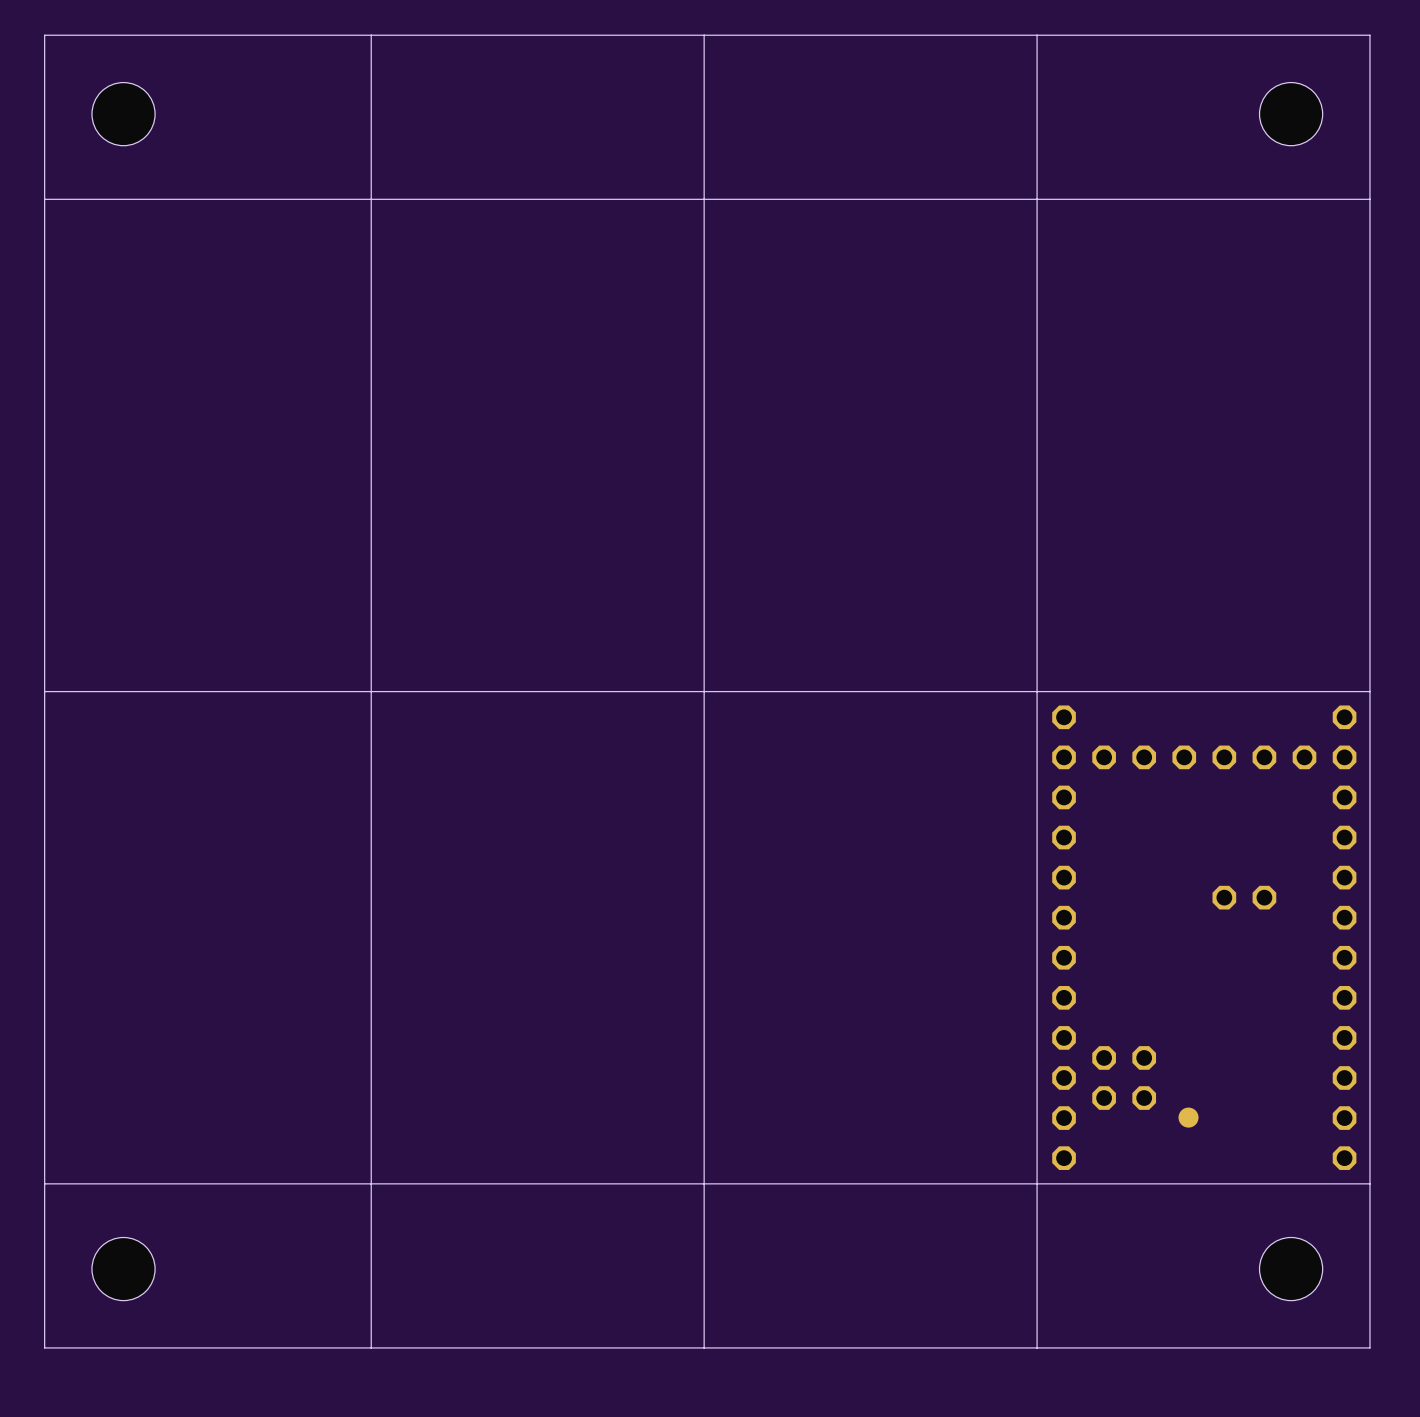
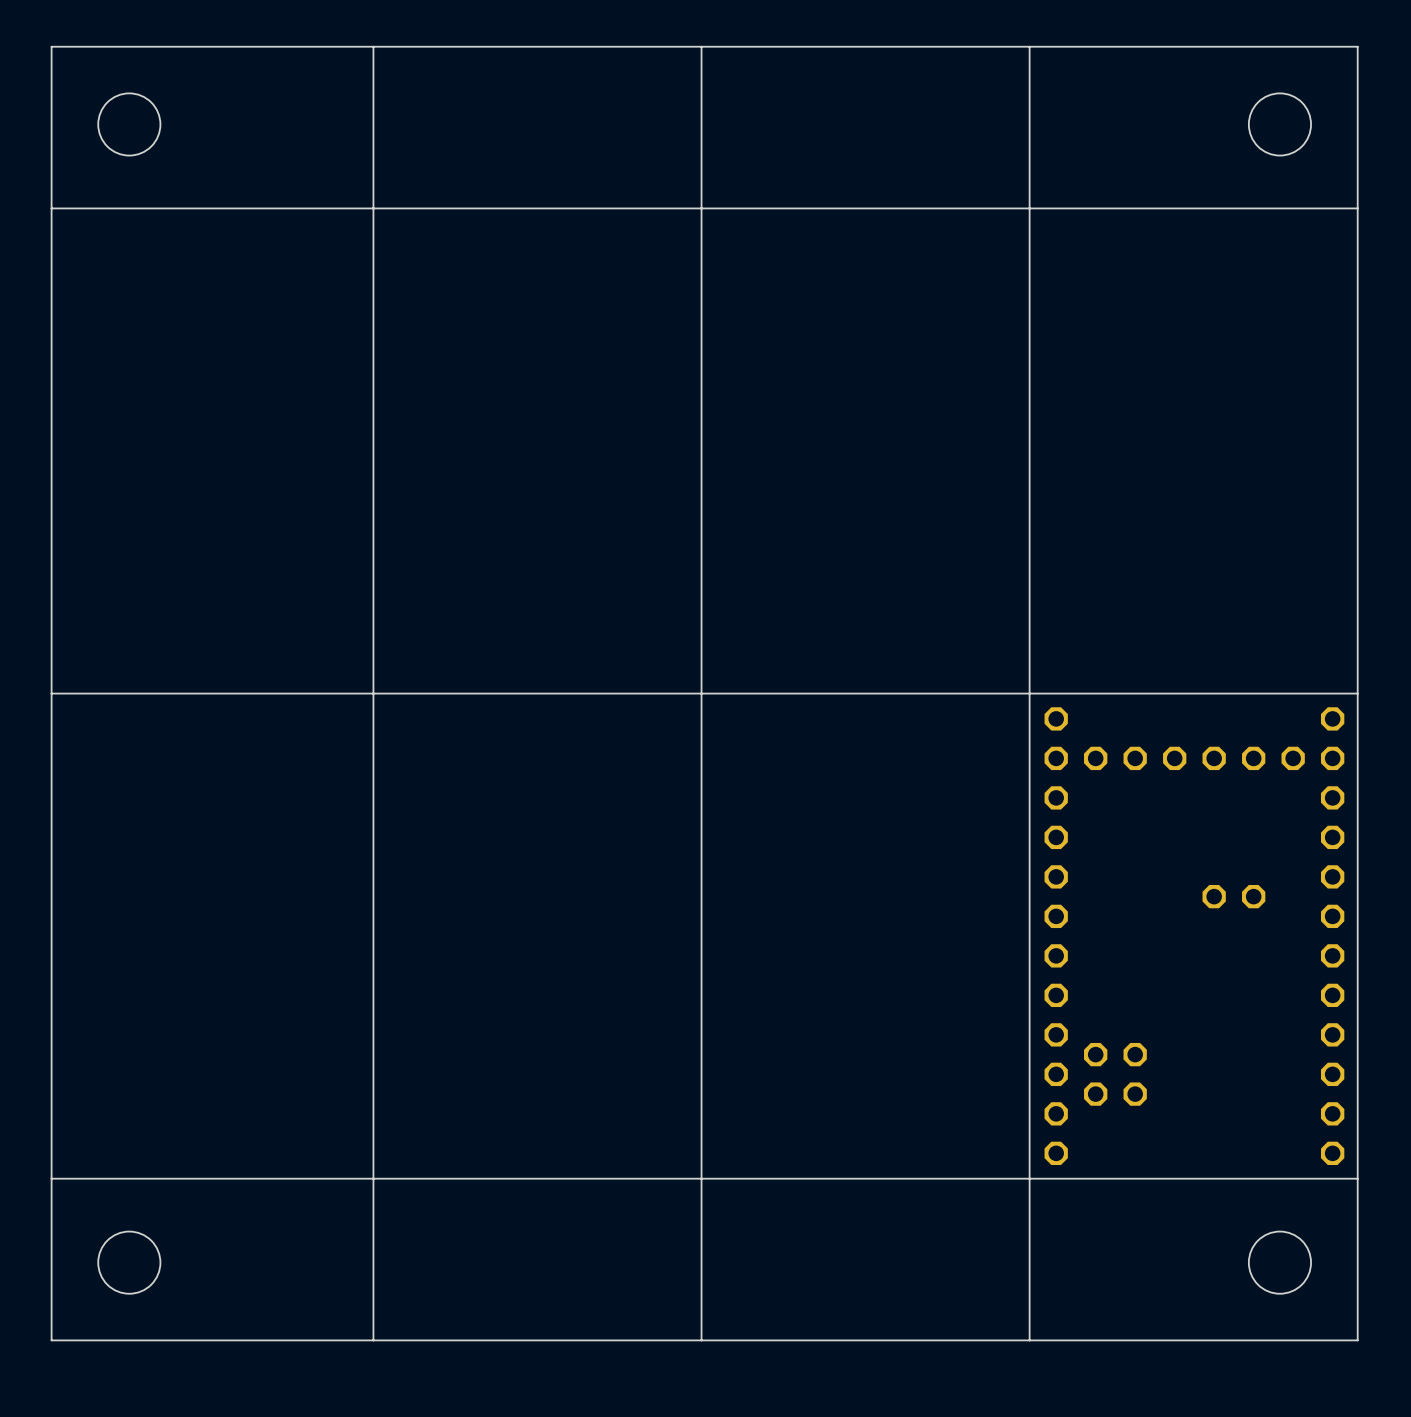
part: (1188, 1117) -> none

